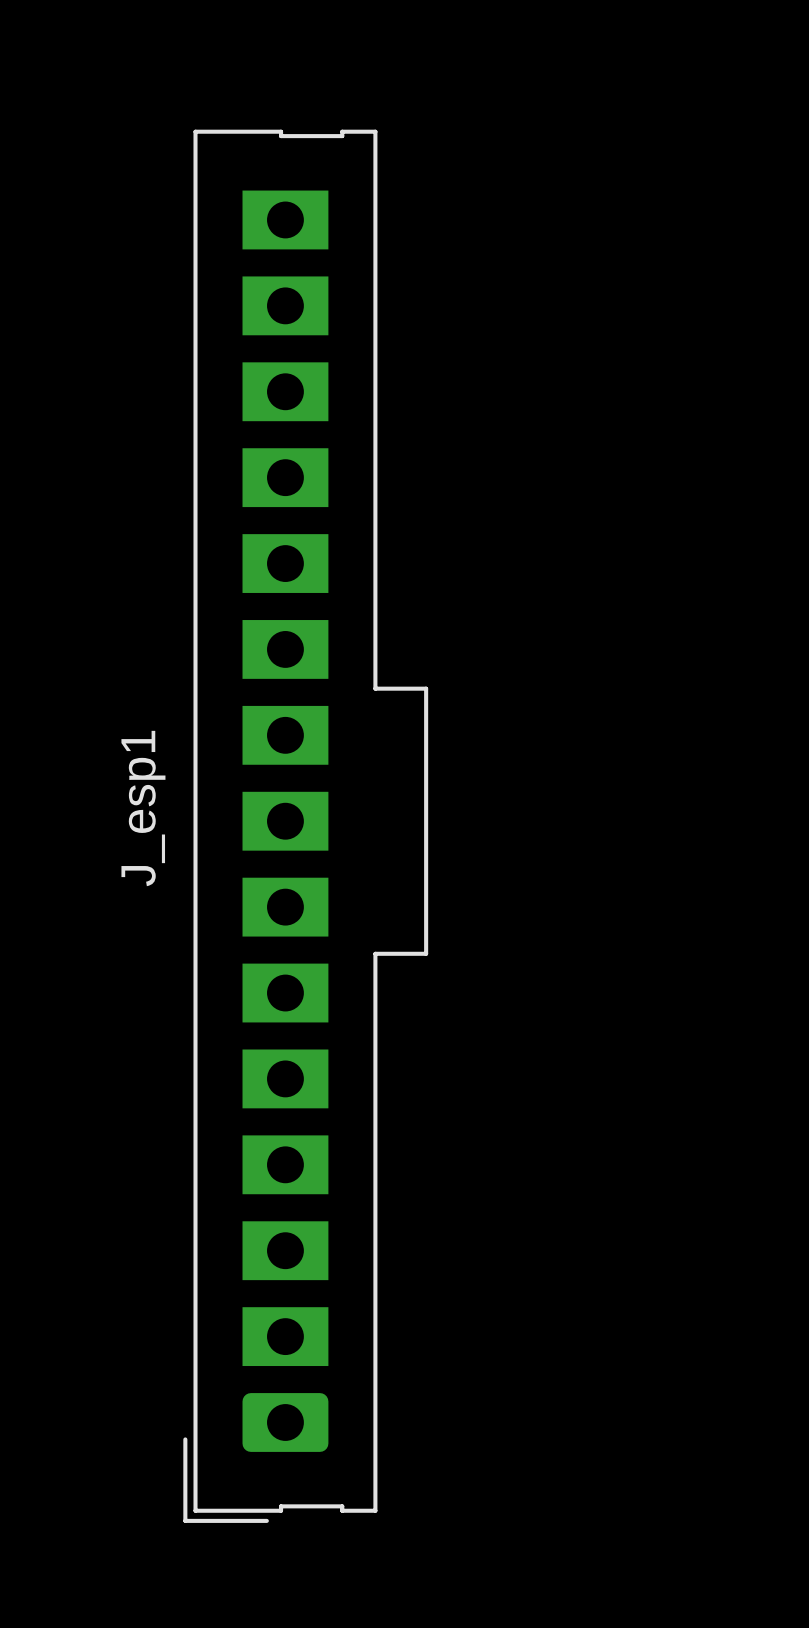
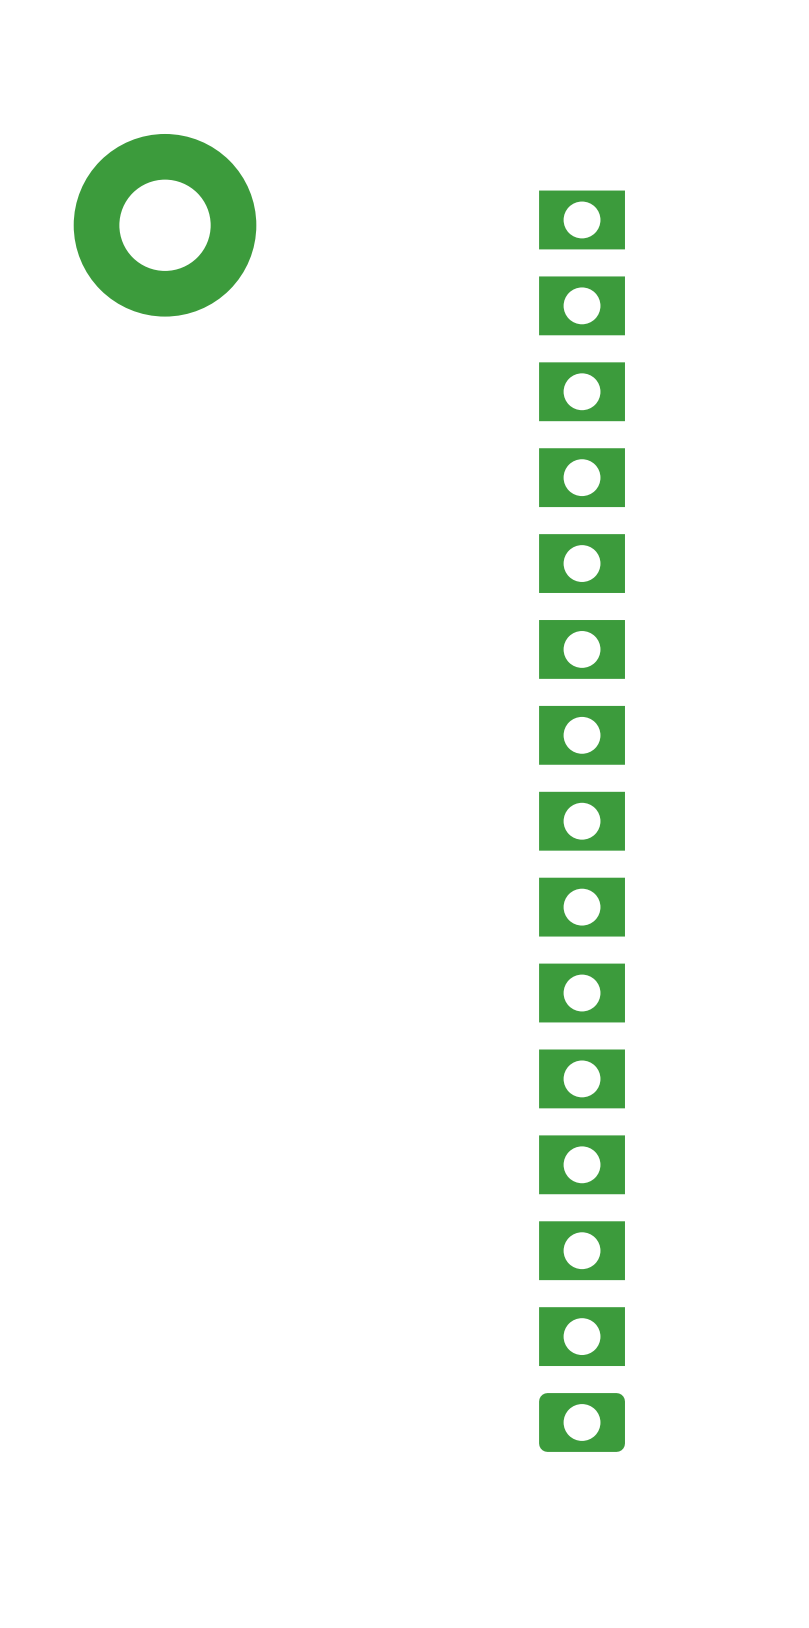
part: none -> (165, 225)
J_esp1 side: bottom (305, 826) -> top (582, 821)

